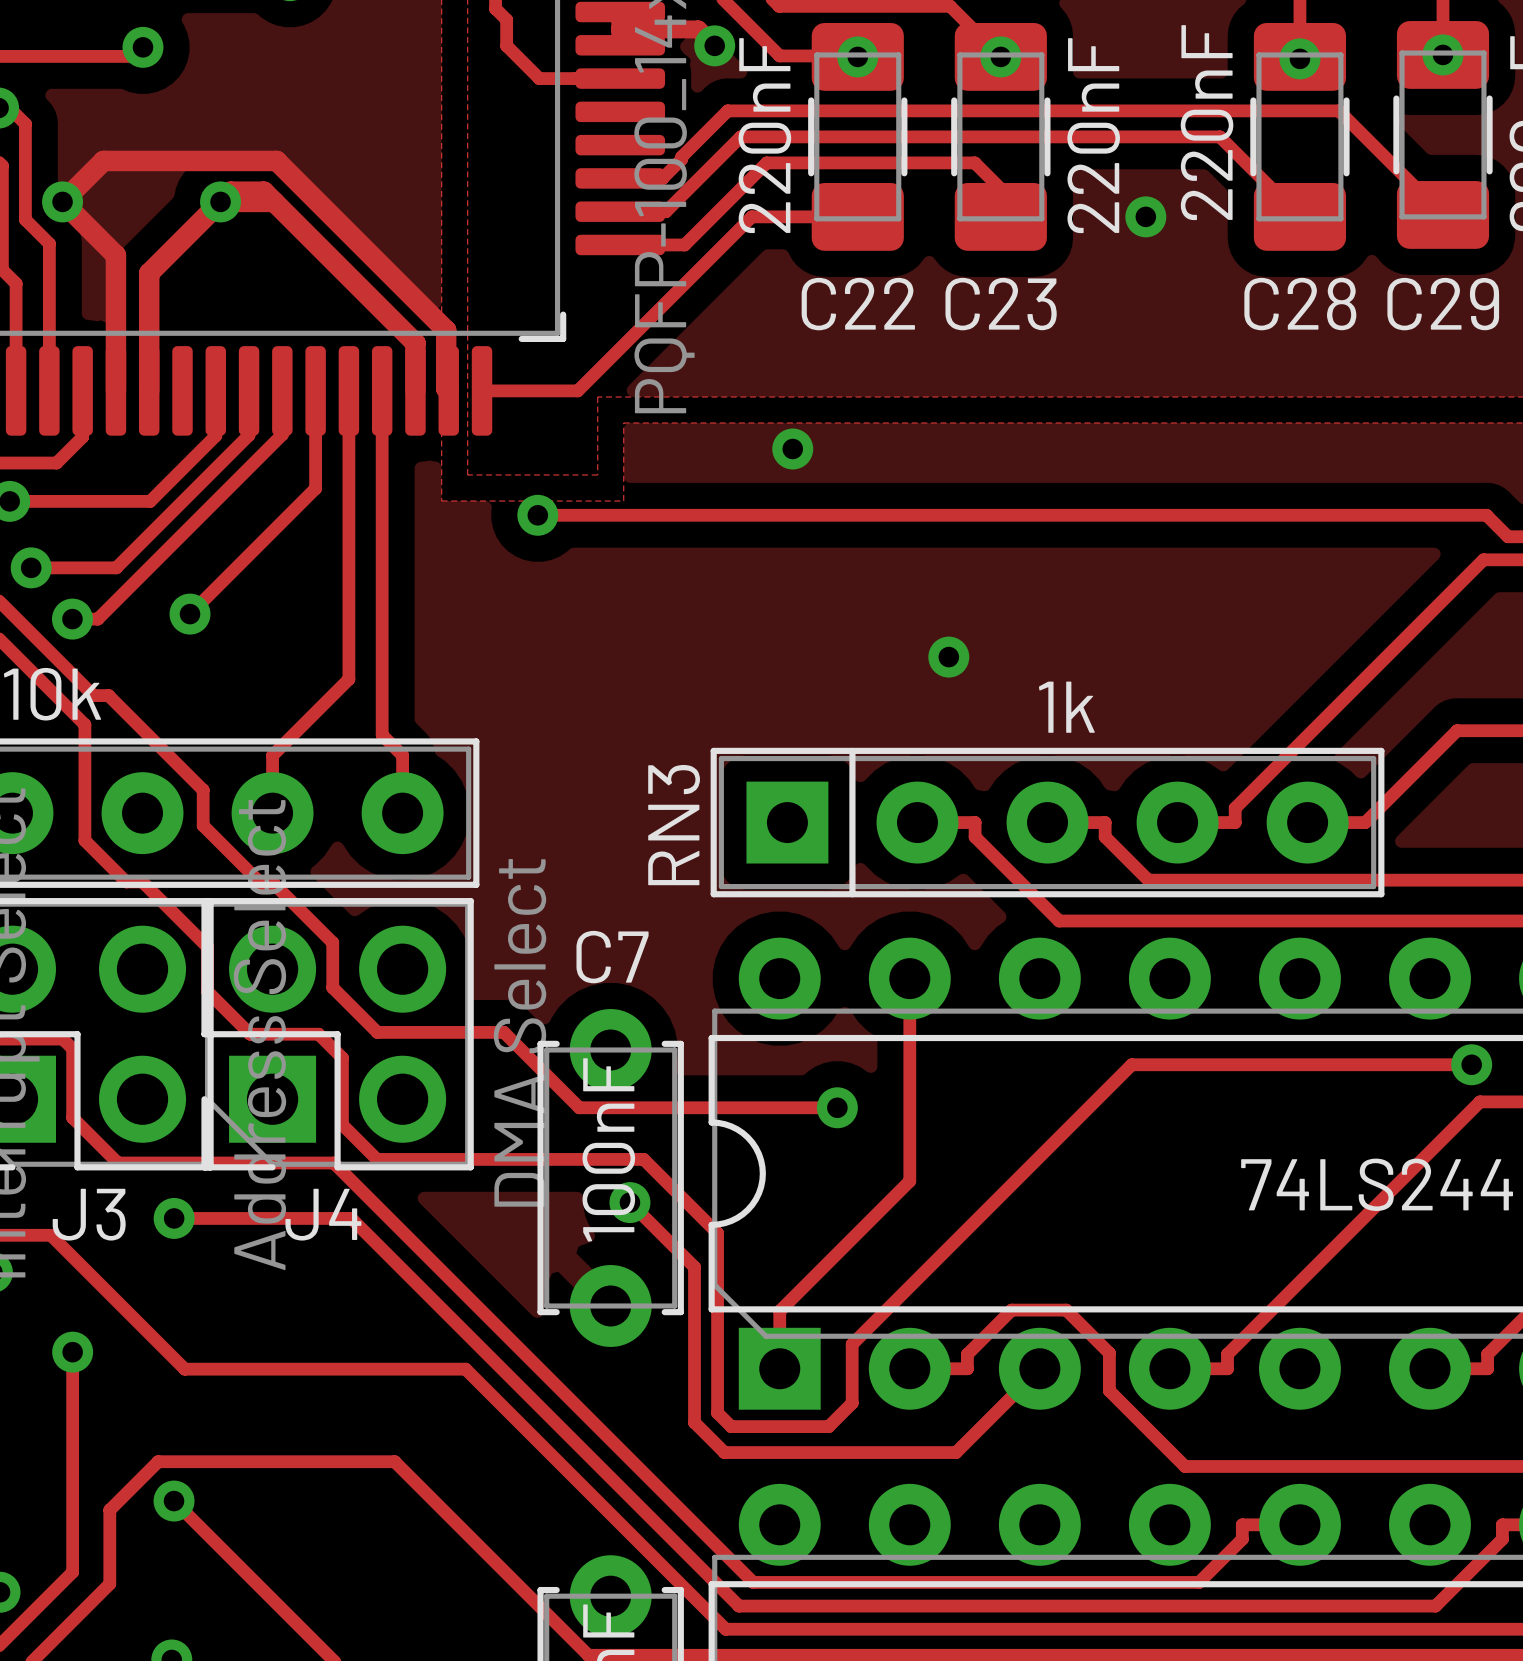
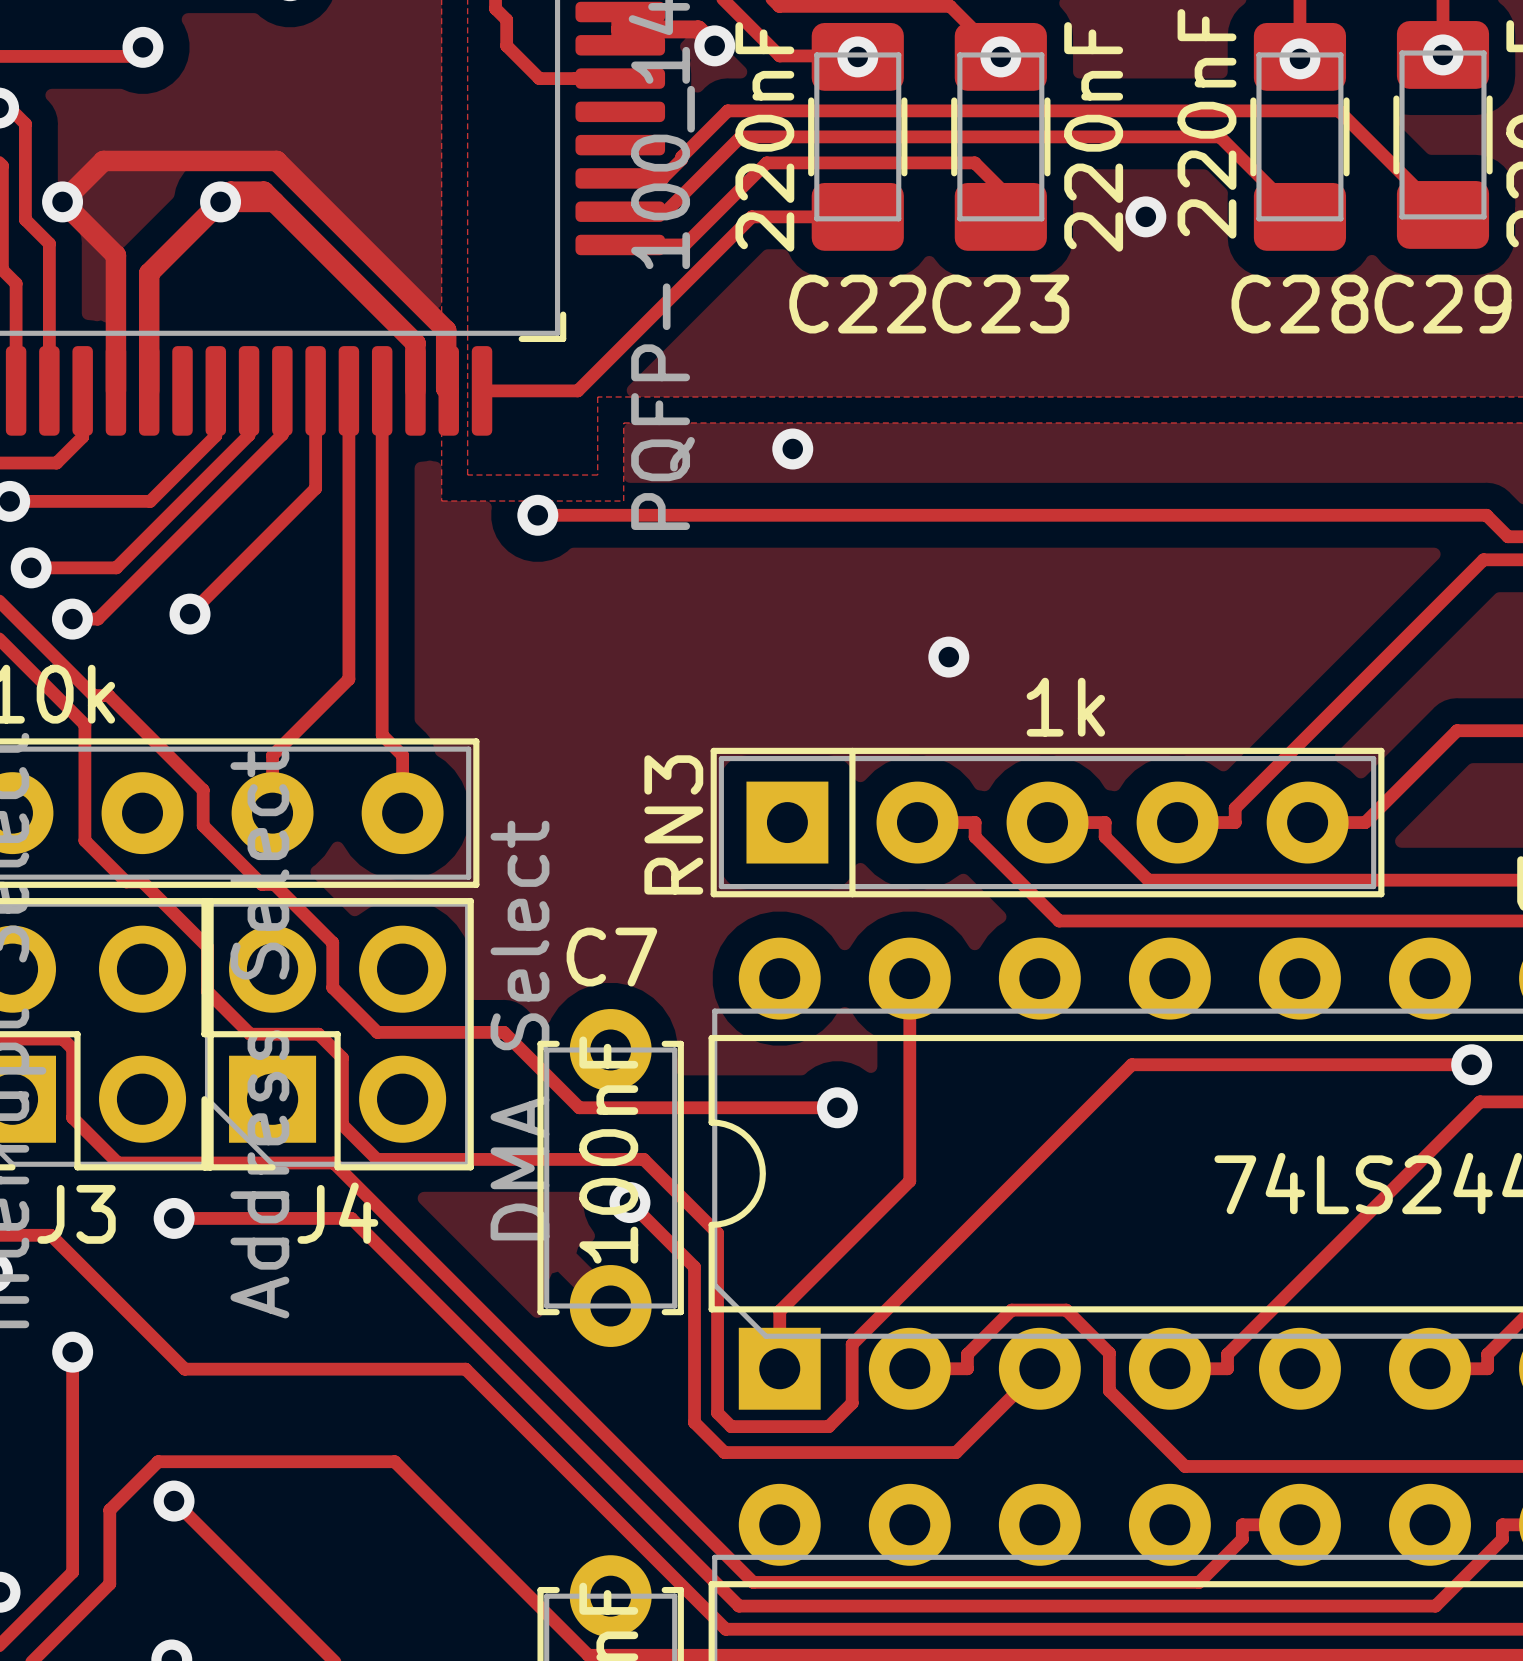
J3 name position: J3 (89, 1214) -> J3 (76, 1214)
J4 name position: J4 (323, 1214) -> J4 (337, 1213)

